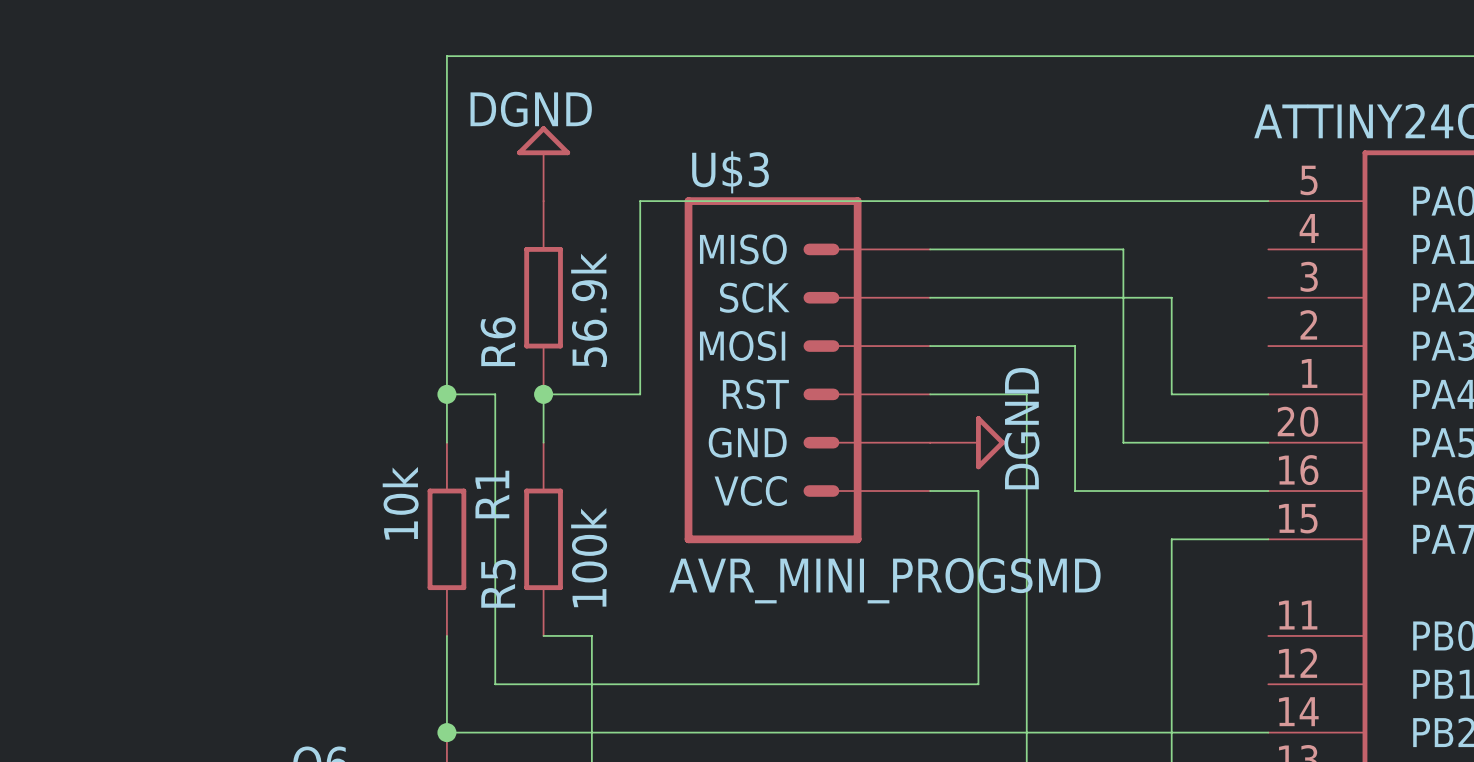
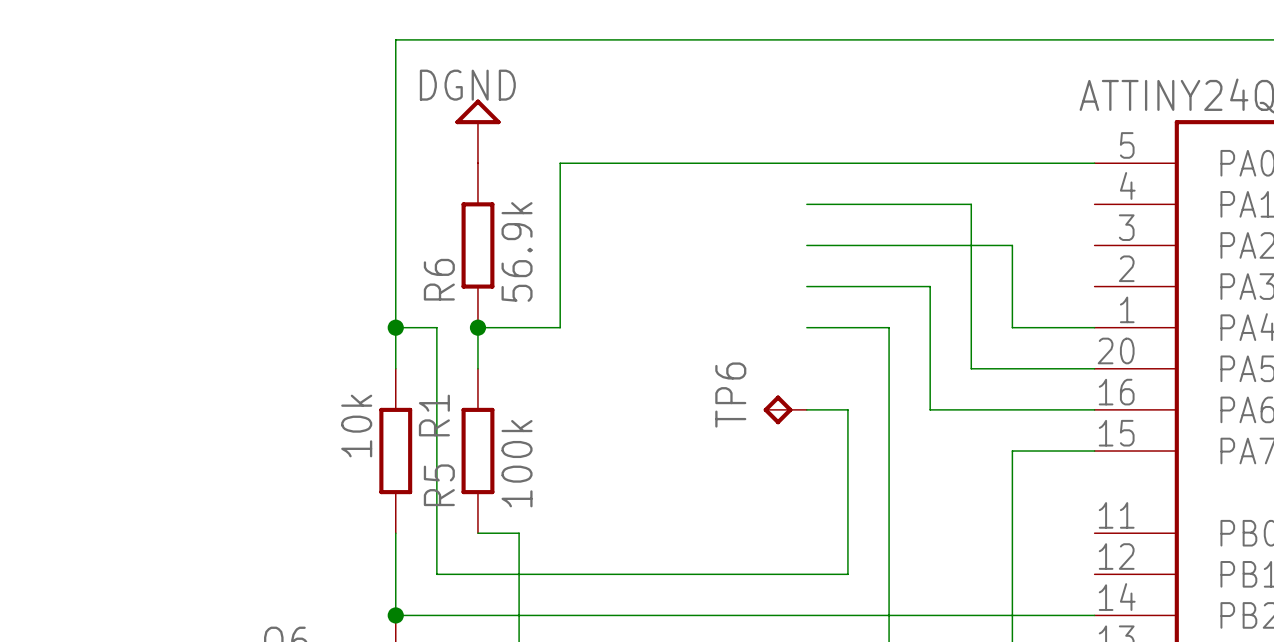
U$3: AVR_MINI_PROGSMD (807, 370) -> none
power symbol: DGND (967, 442) -> none
TP6: none -> (785, 409)

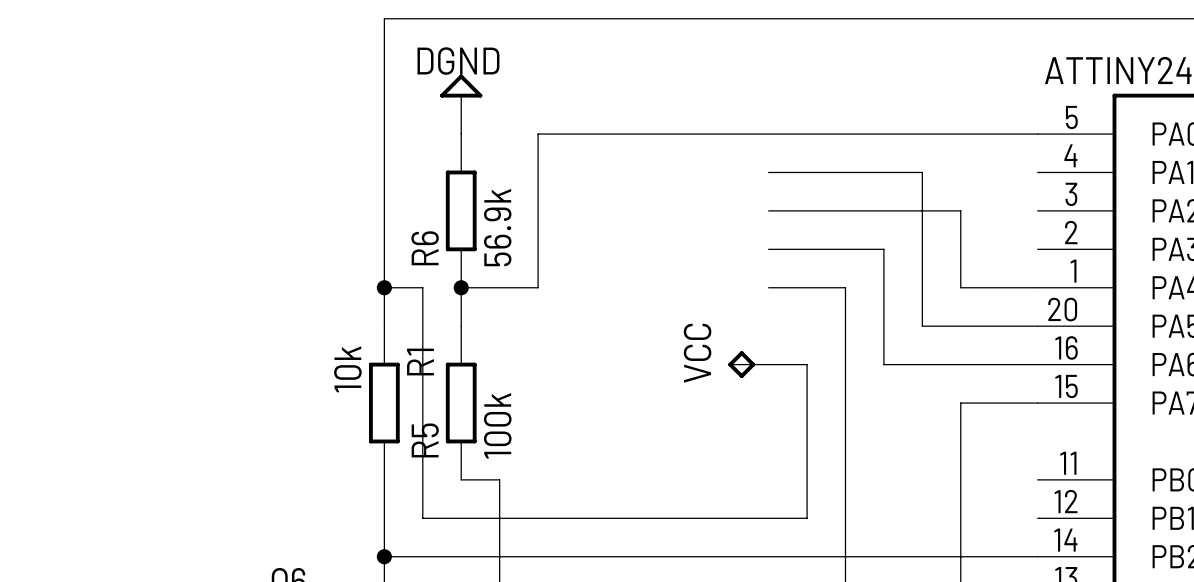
TP6 name: TP6 (730, 395) -> VCC (697, 353)

